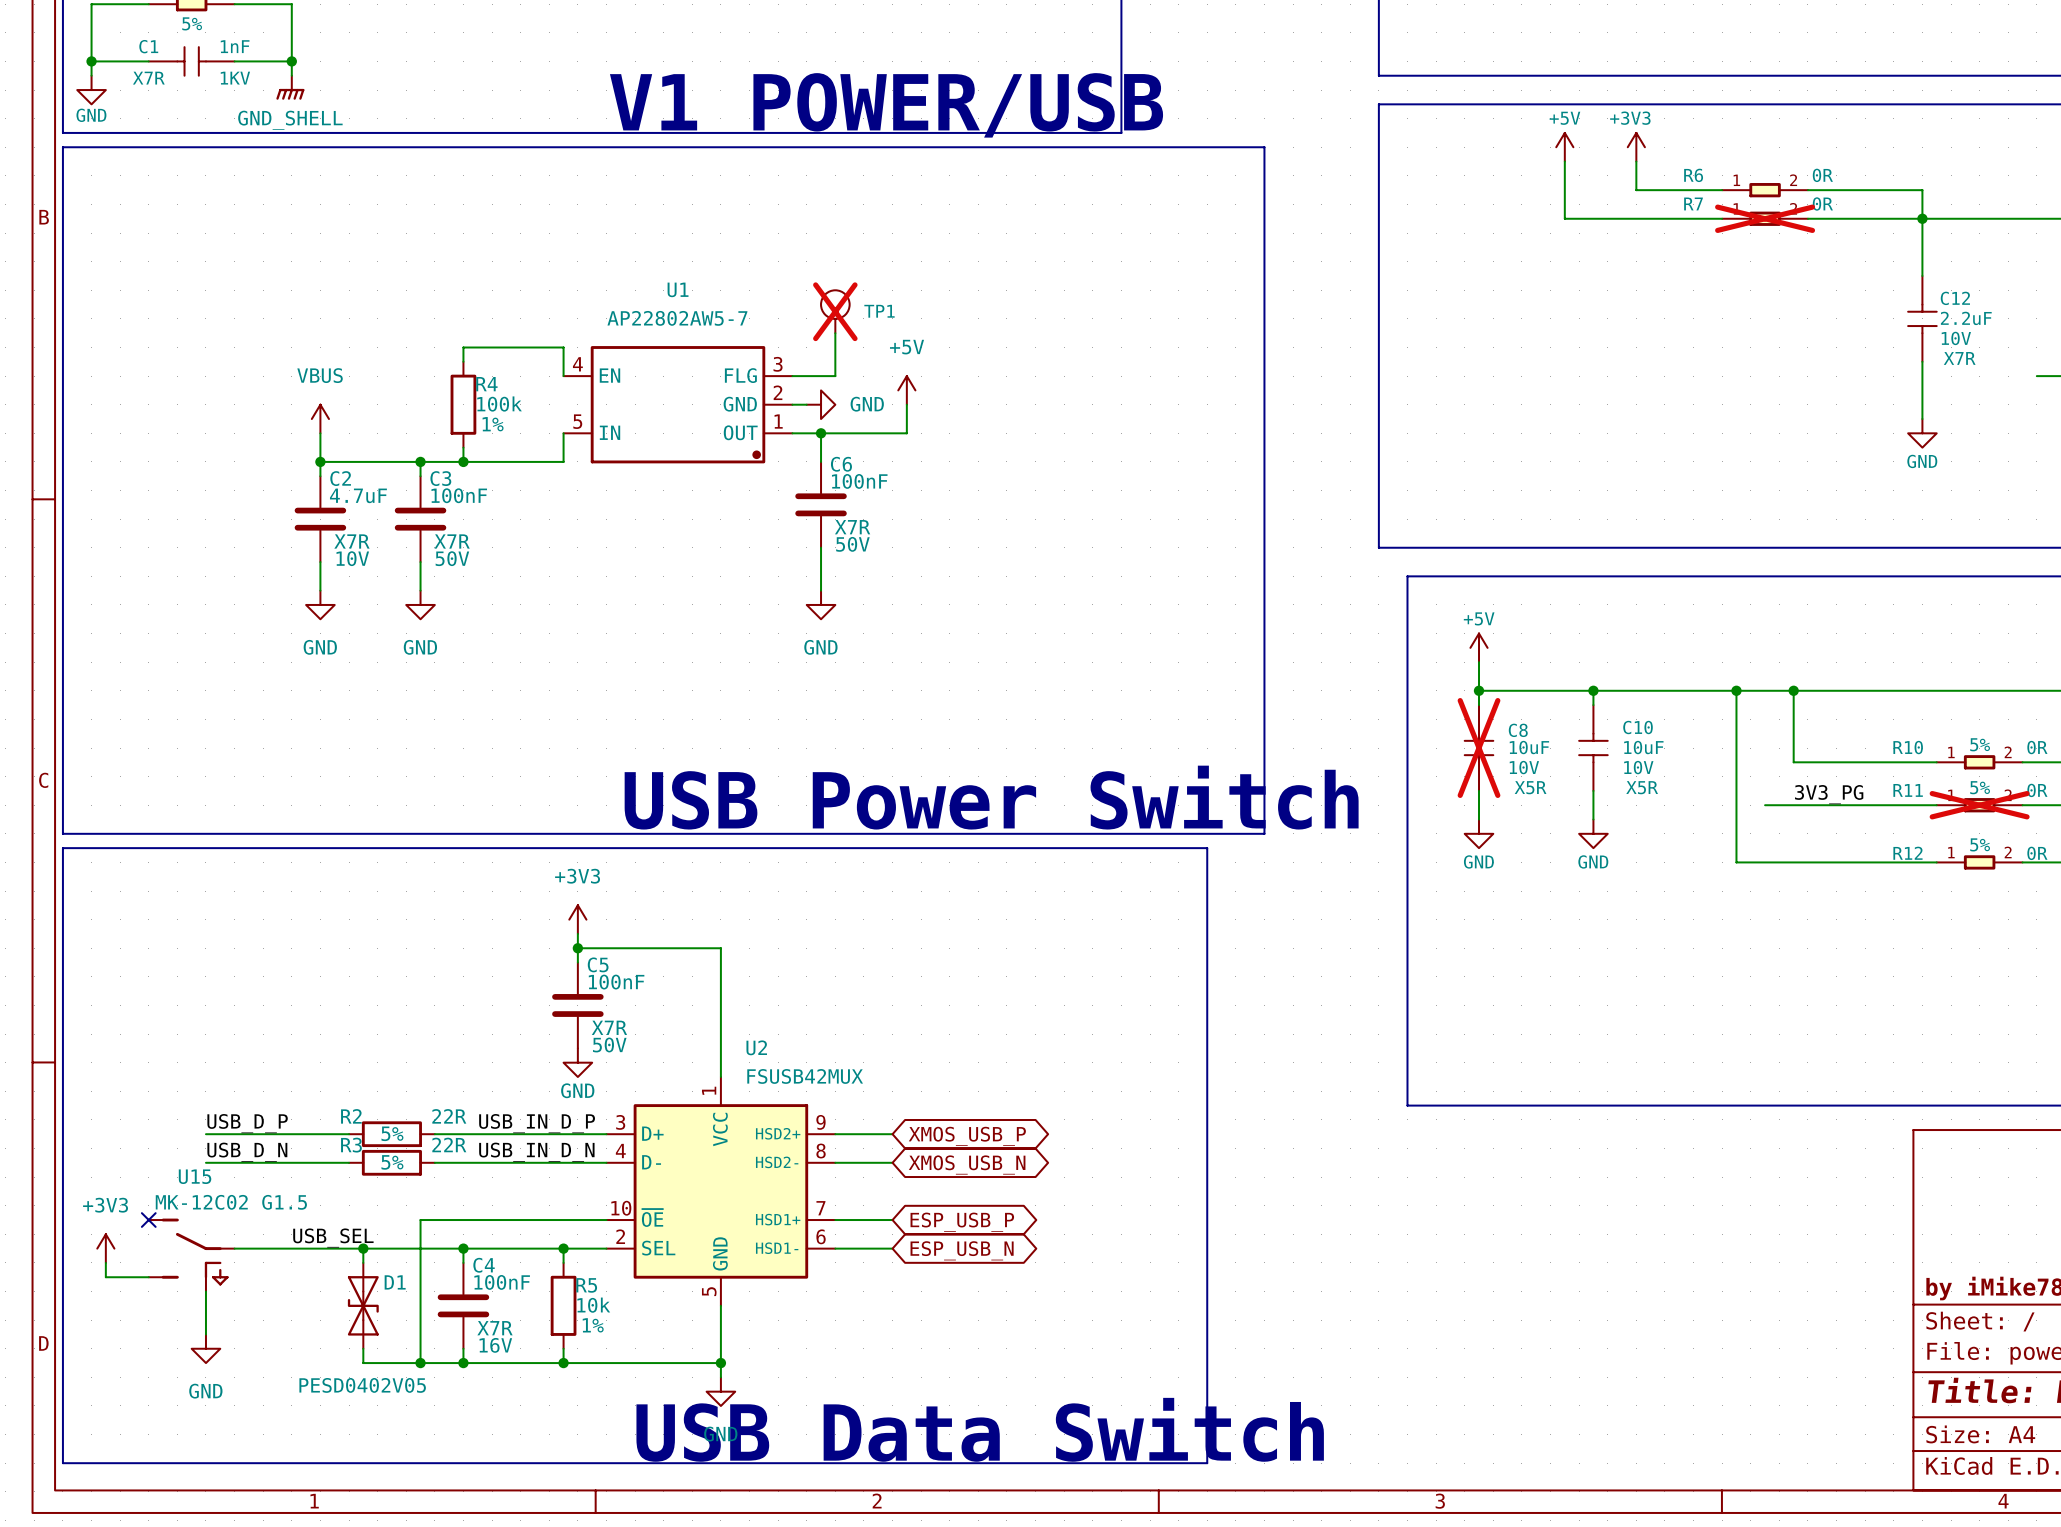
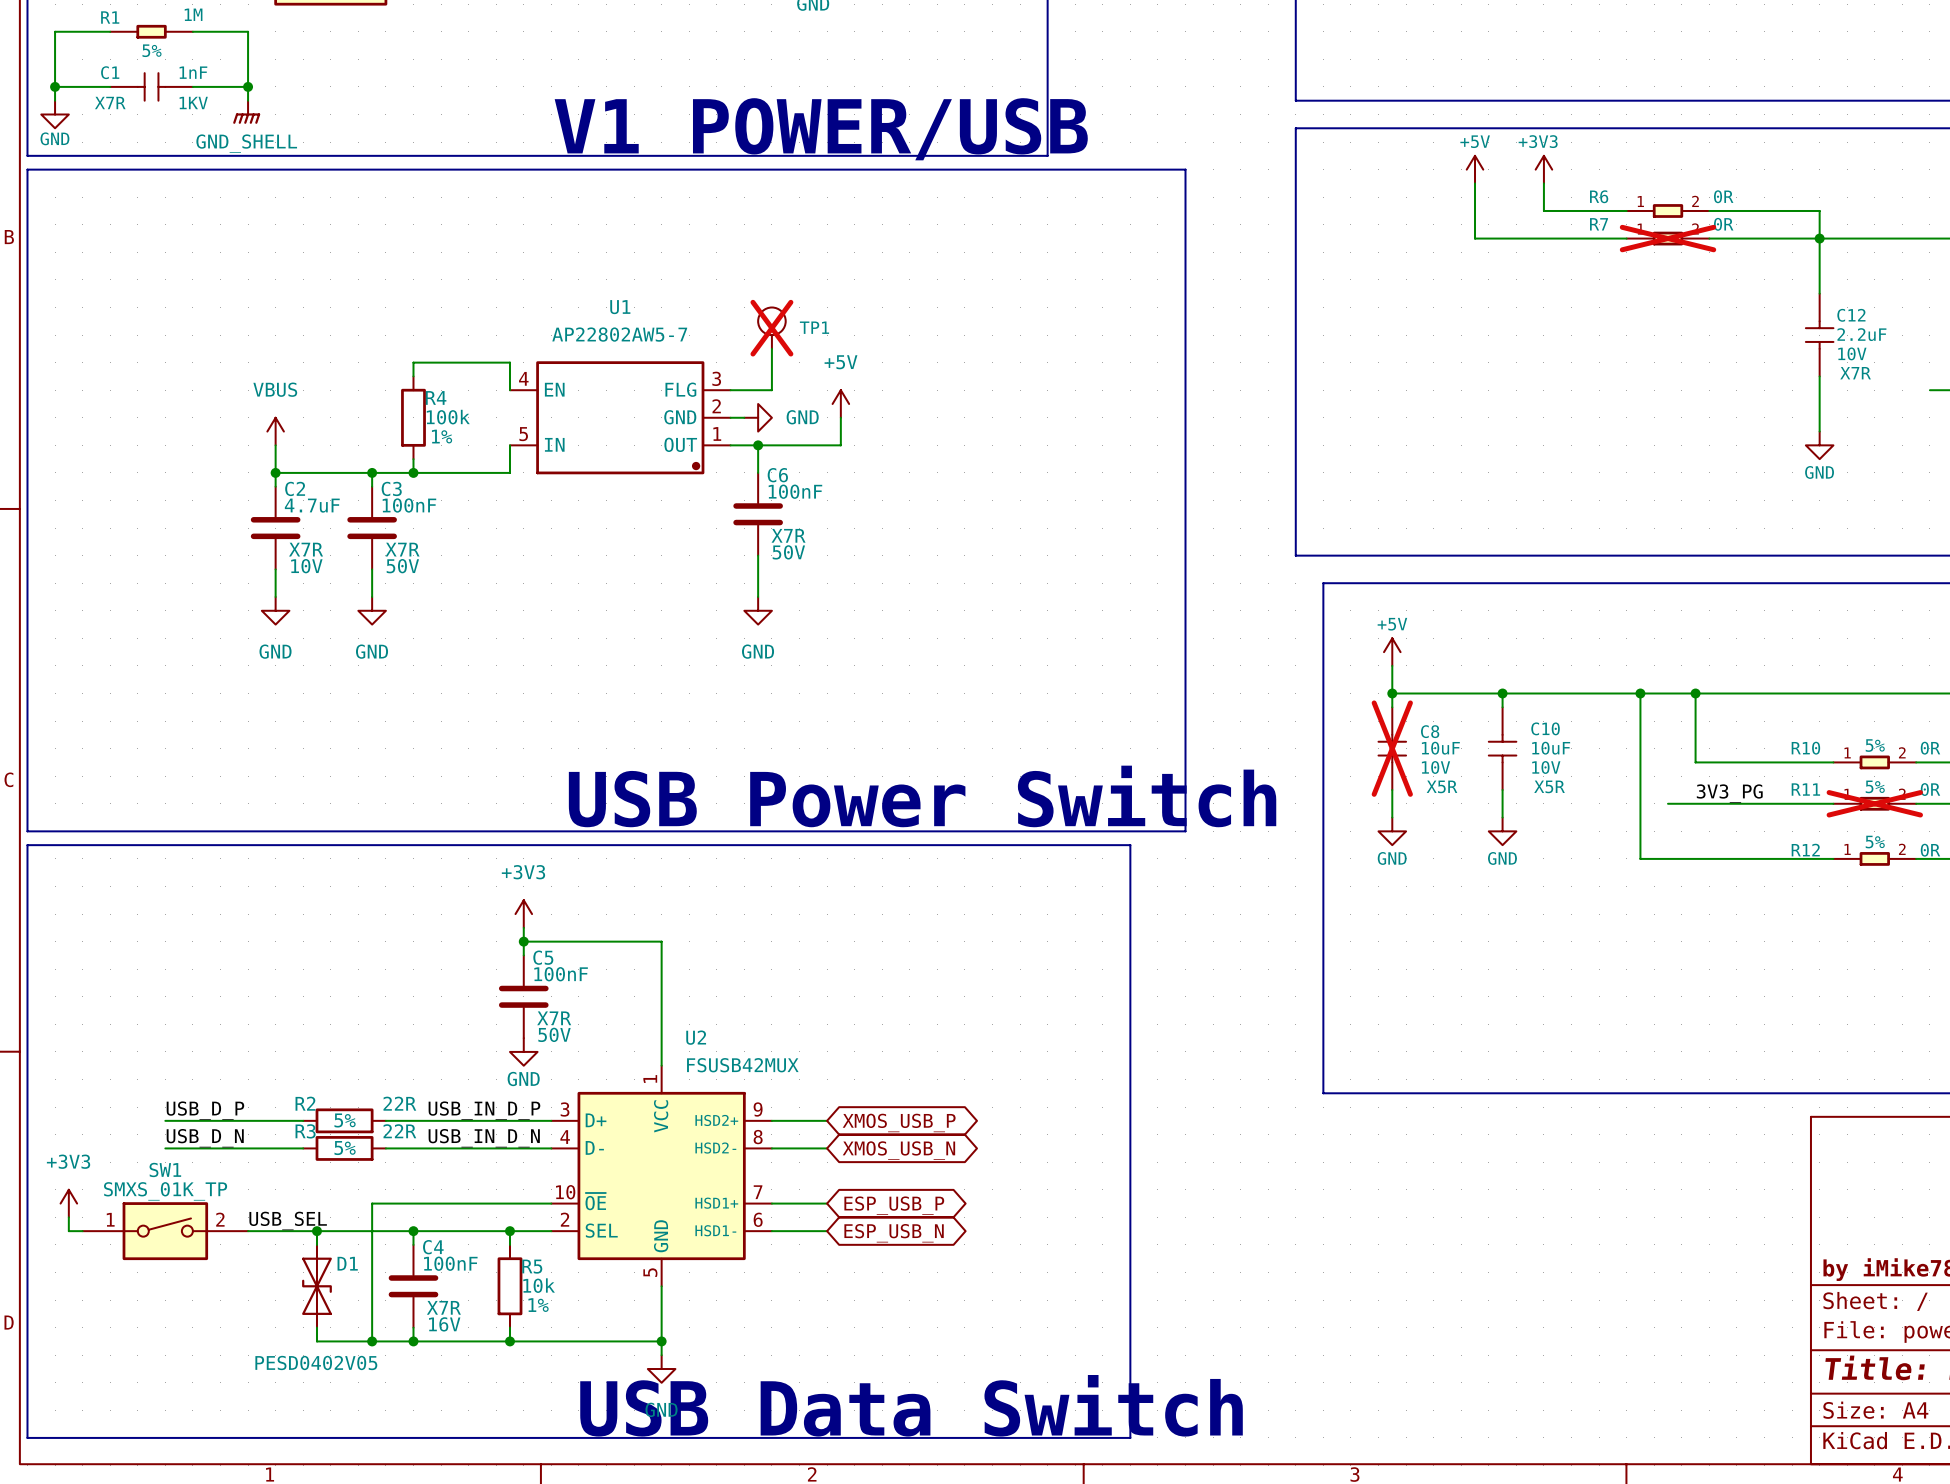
no-connect mark: (148, 1220) -> none
power symbol position: +3V3 (105, 1248) -> +3V3 (68, 1203)
SW1: none -> SMXS_01K_TP (165, 1231)
U15: MK-12C02 G1.5 (191, 1255) -> none
wire: (105, 1262) (105, 1277) (148, 1277) -> none
wire: (205, 1291) (205, 1334) -> none
power symbol: GND (205, 1348) -> none

